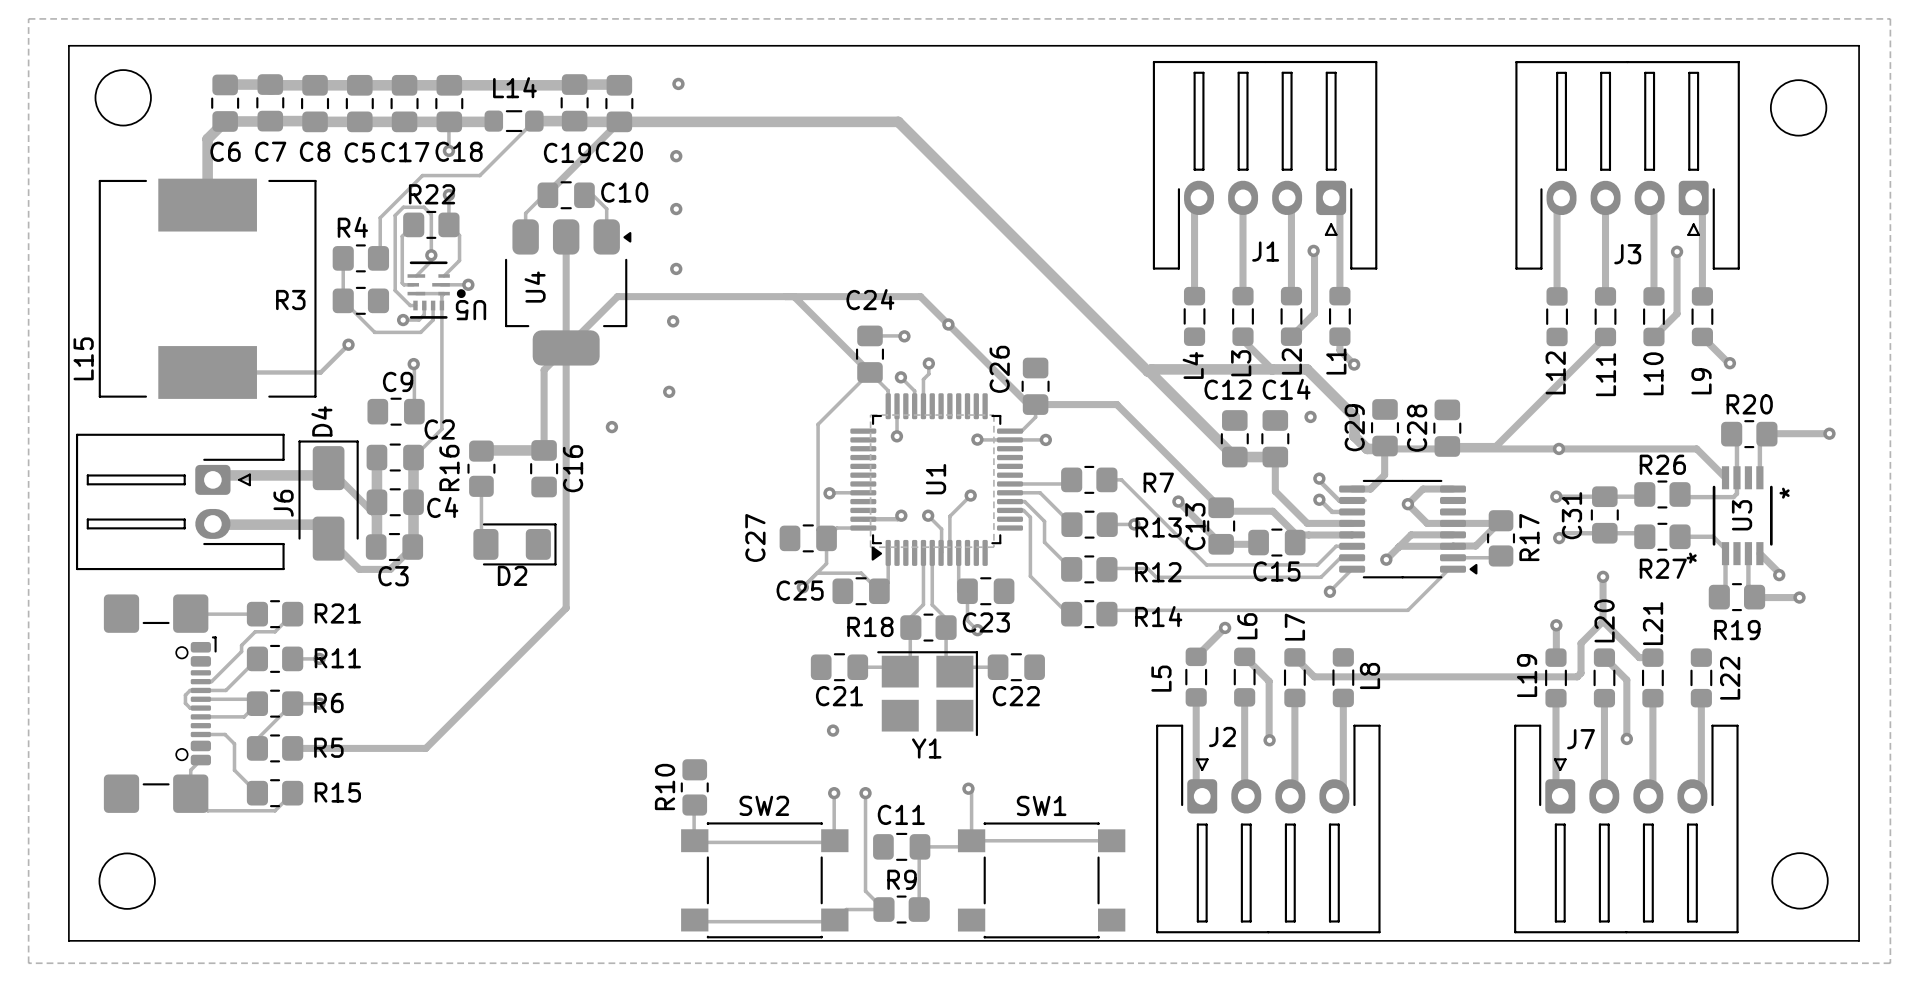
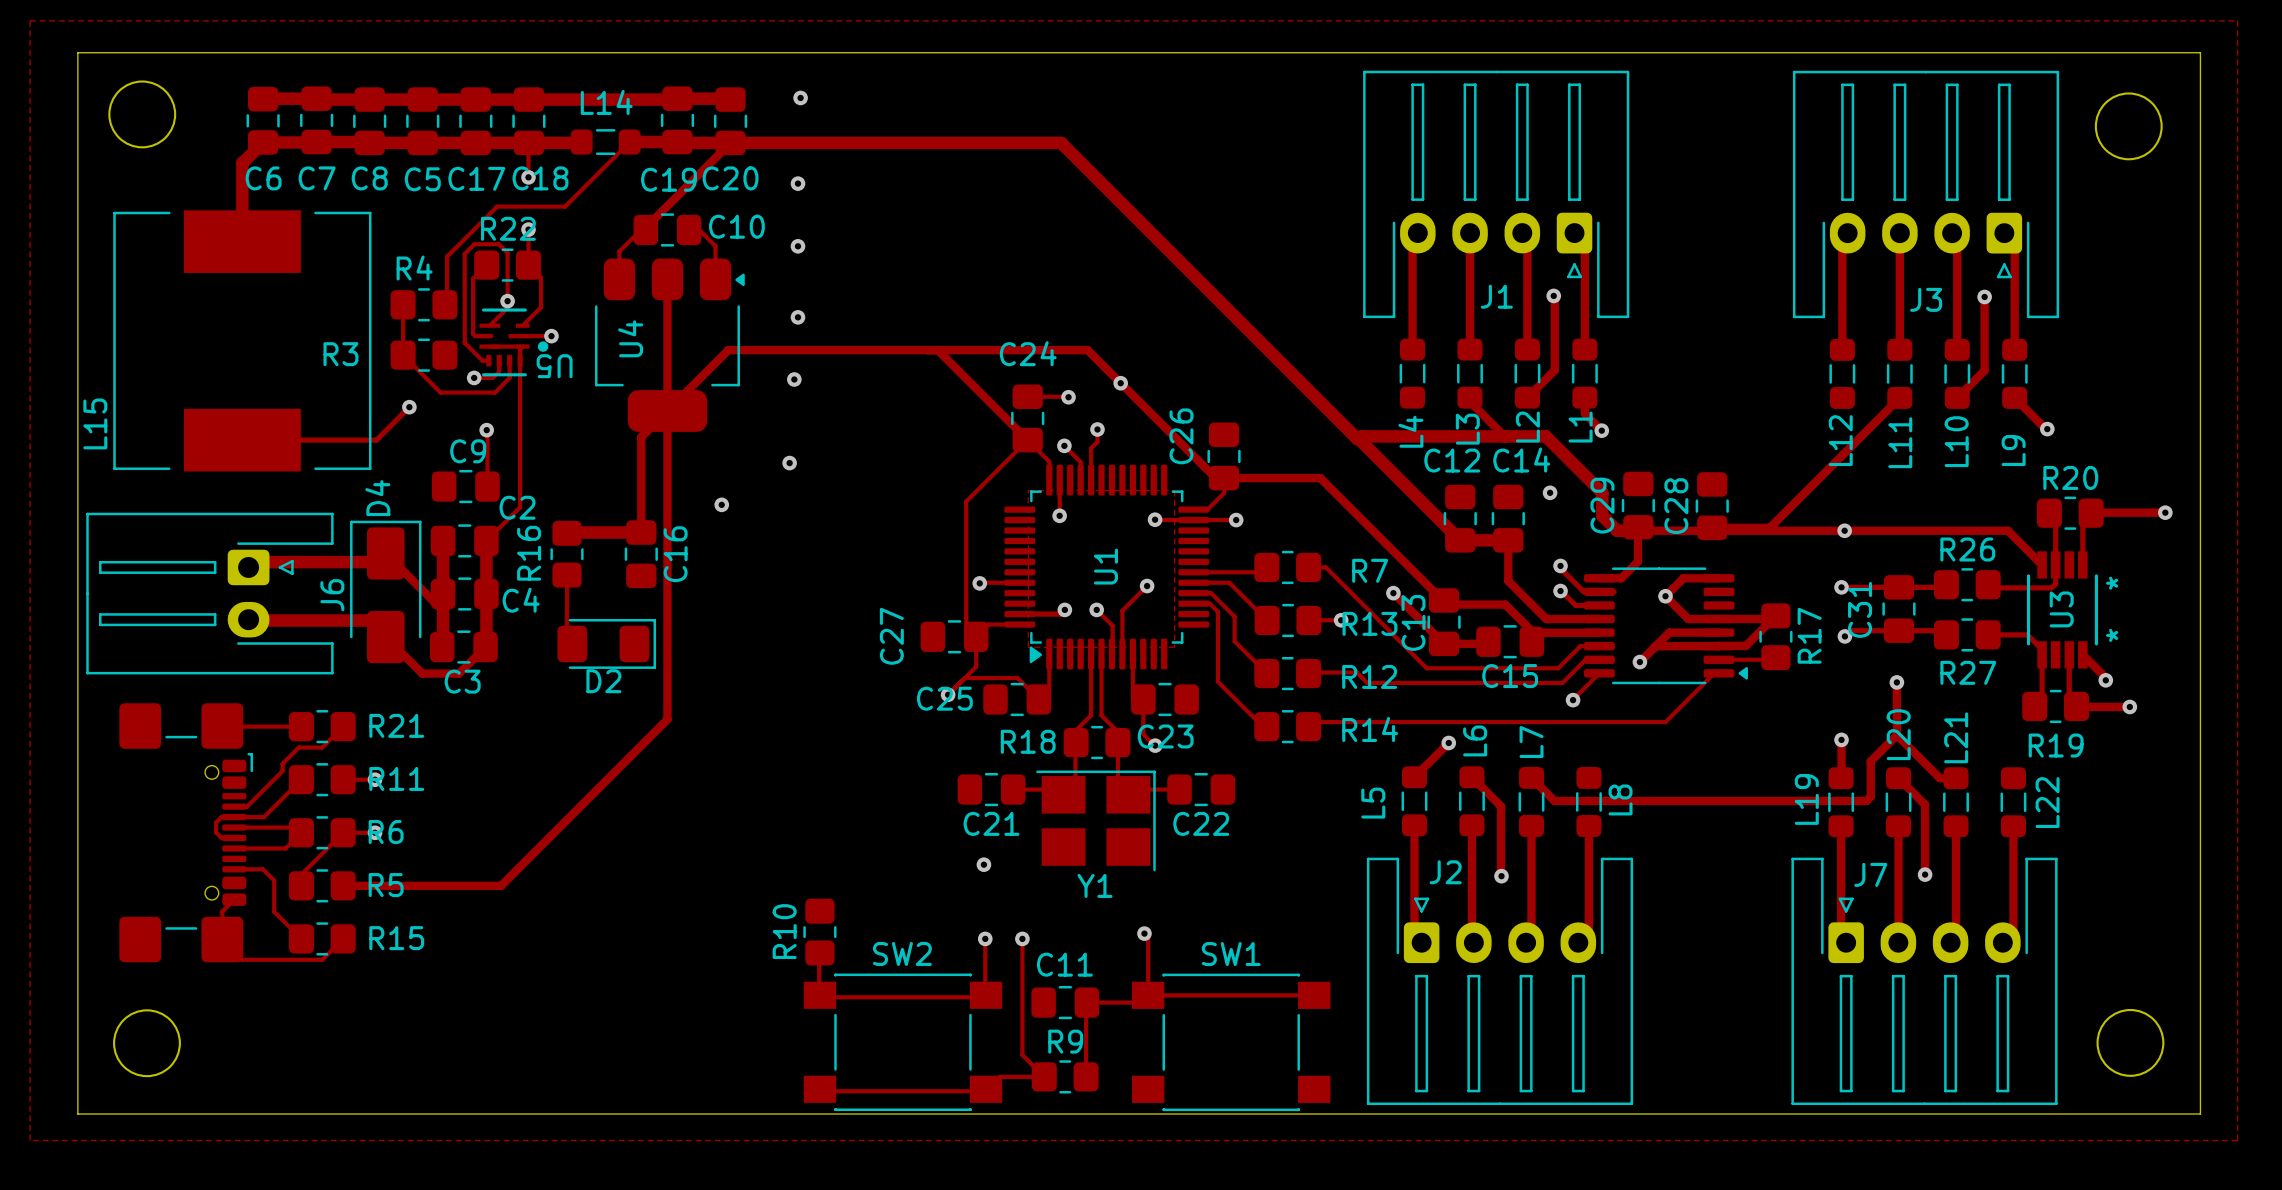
U3 footprint: [1712, 466, 1773, 566] -> [2026, 551, 2099, 669]

